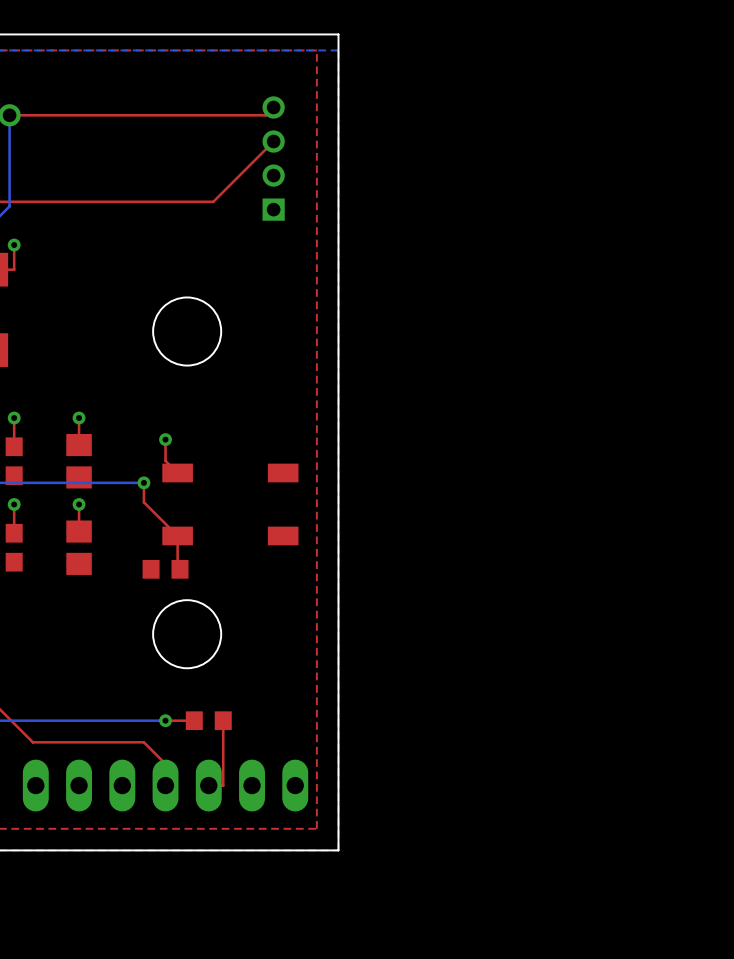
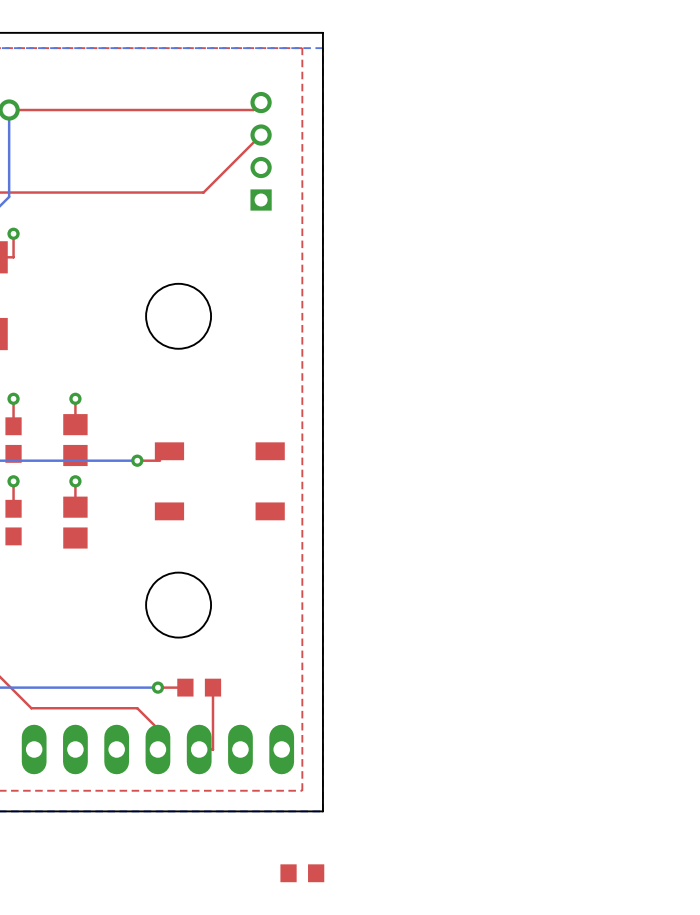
top track: (165, 439) (165, 460) (177, 472) -> none
via: (165, 439) -> none
top track: (143, 482) (143, 502) (177, 535) (177, 566) (180, 569) -> (137, 460) (160, 460)
part position: (165, 569) -> (302, 873)

